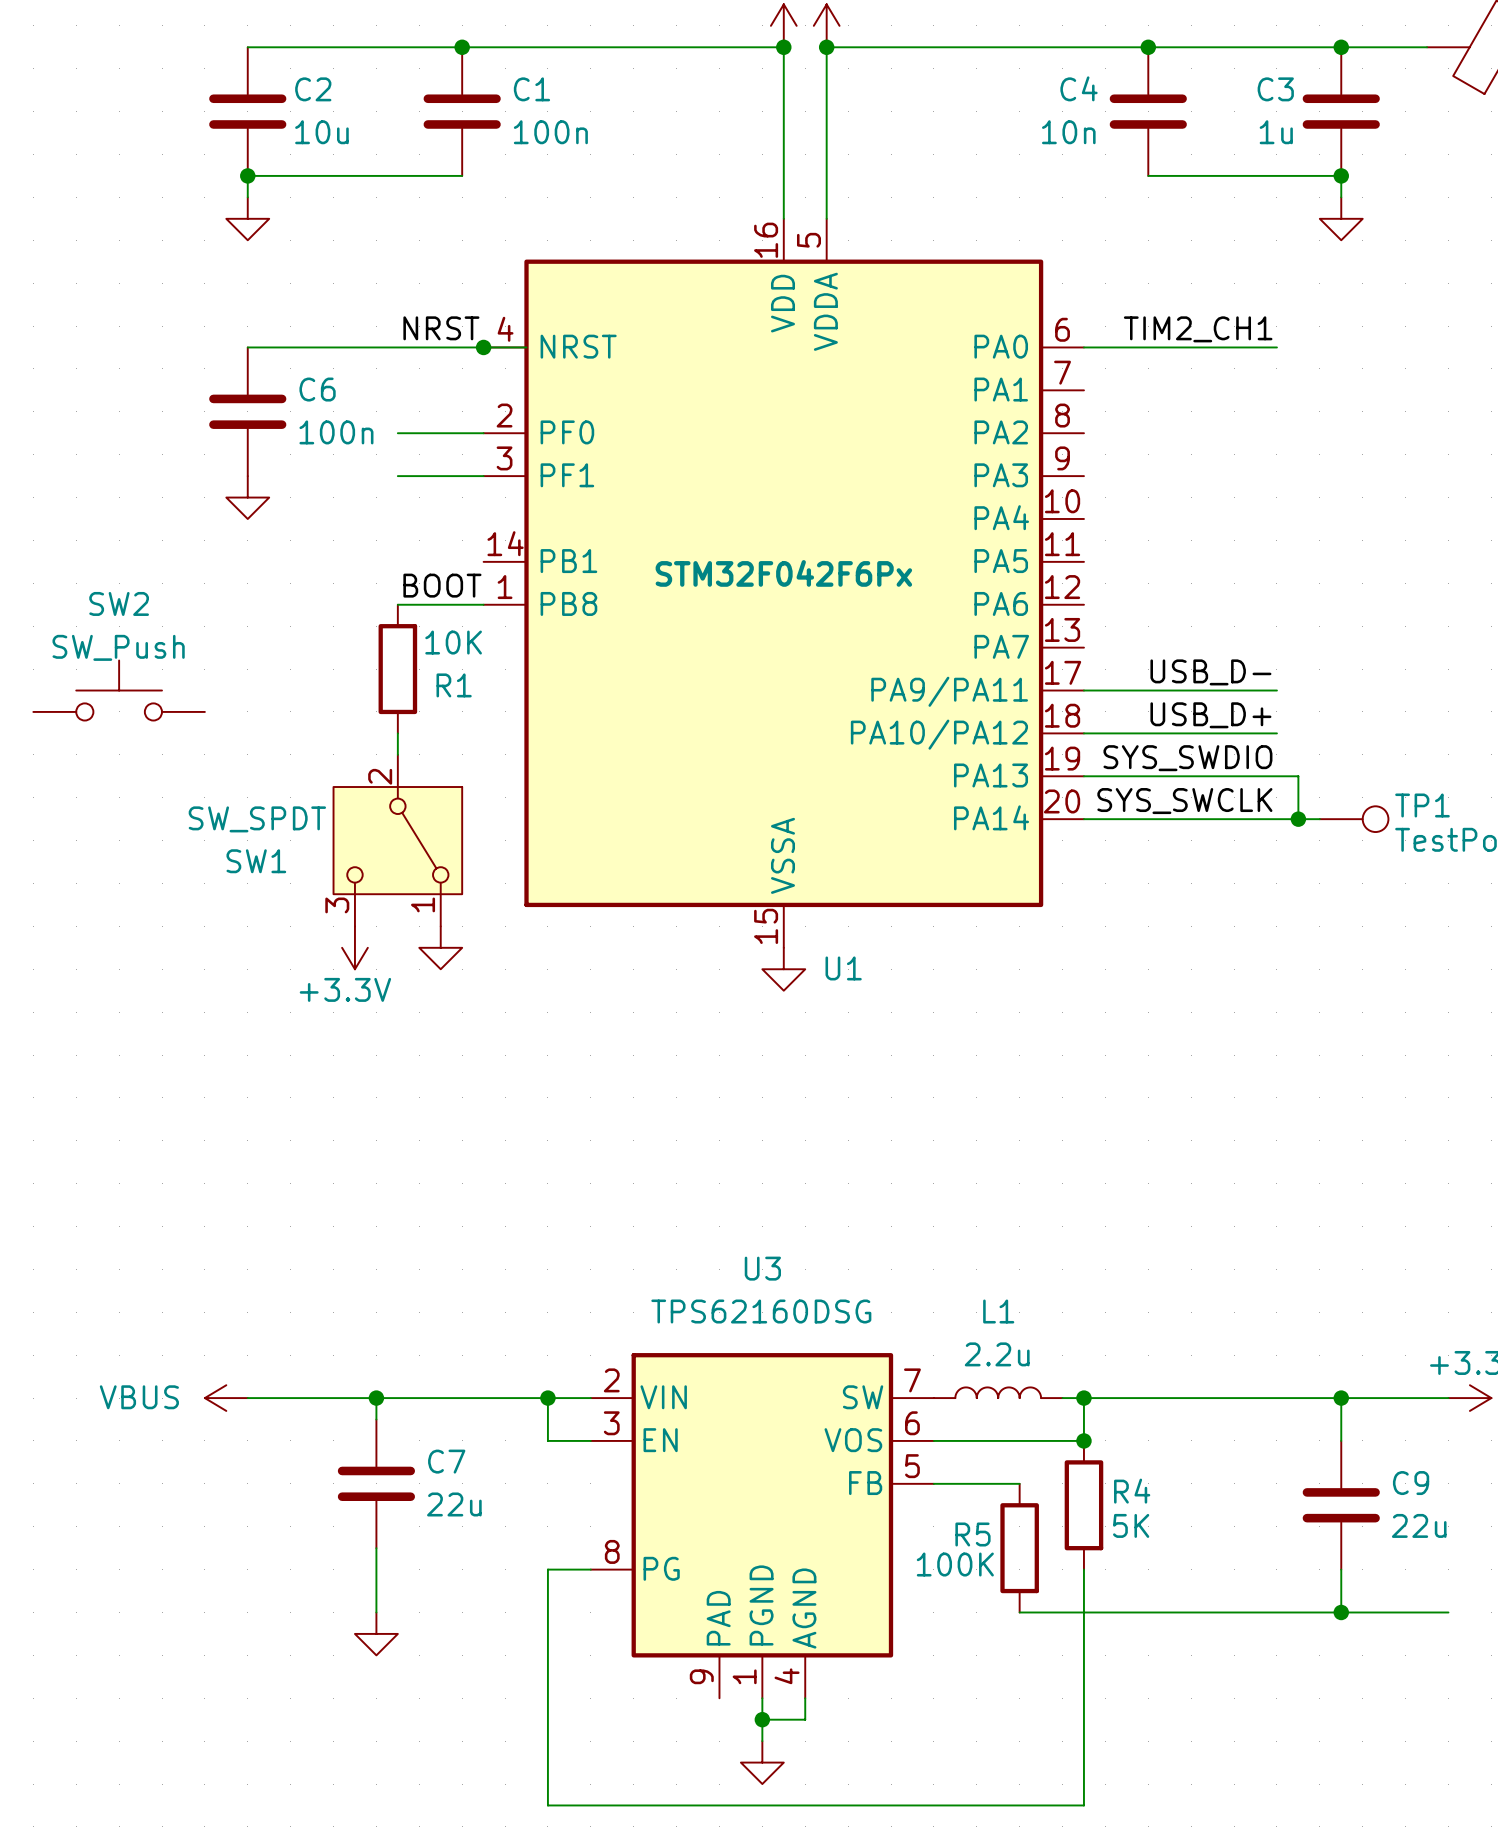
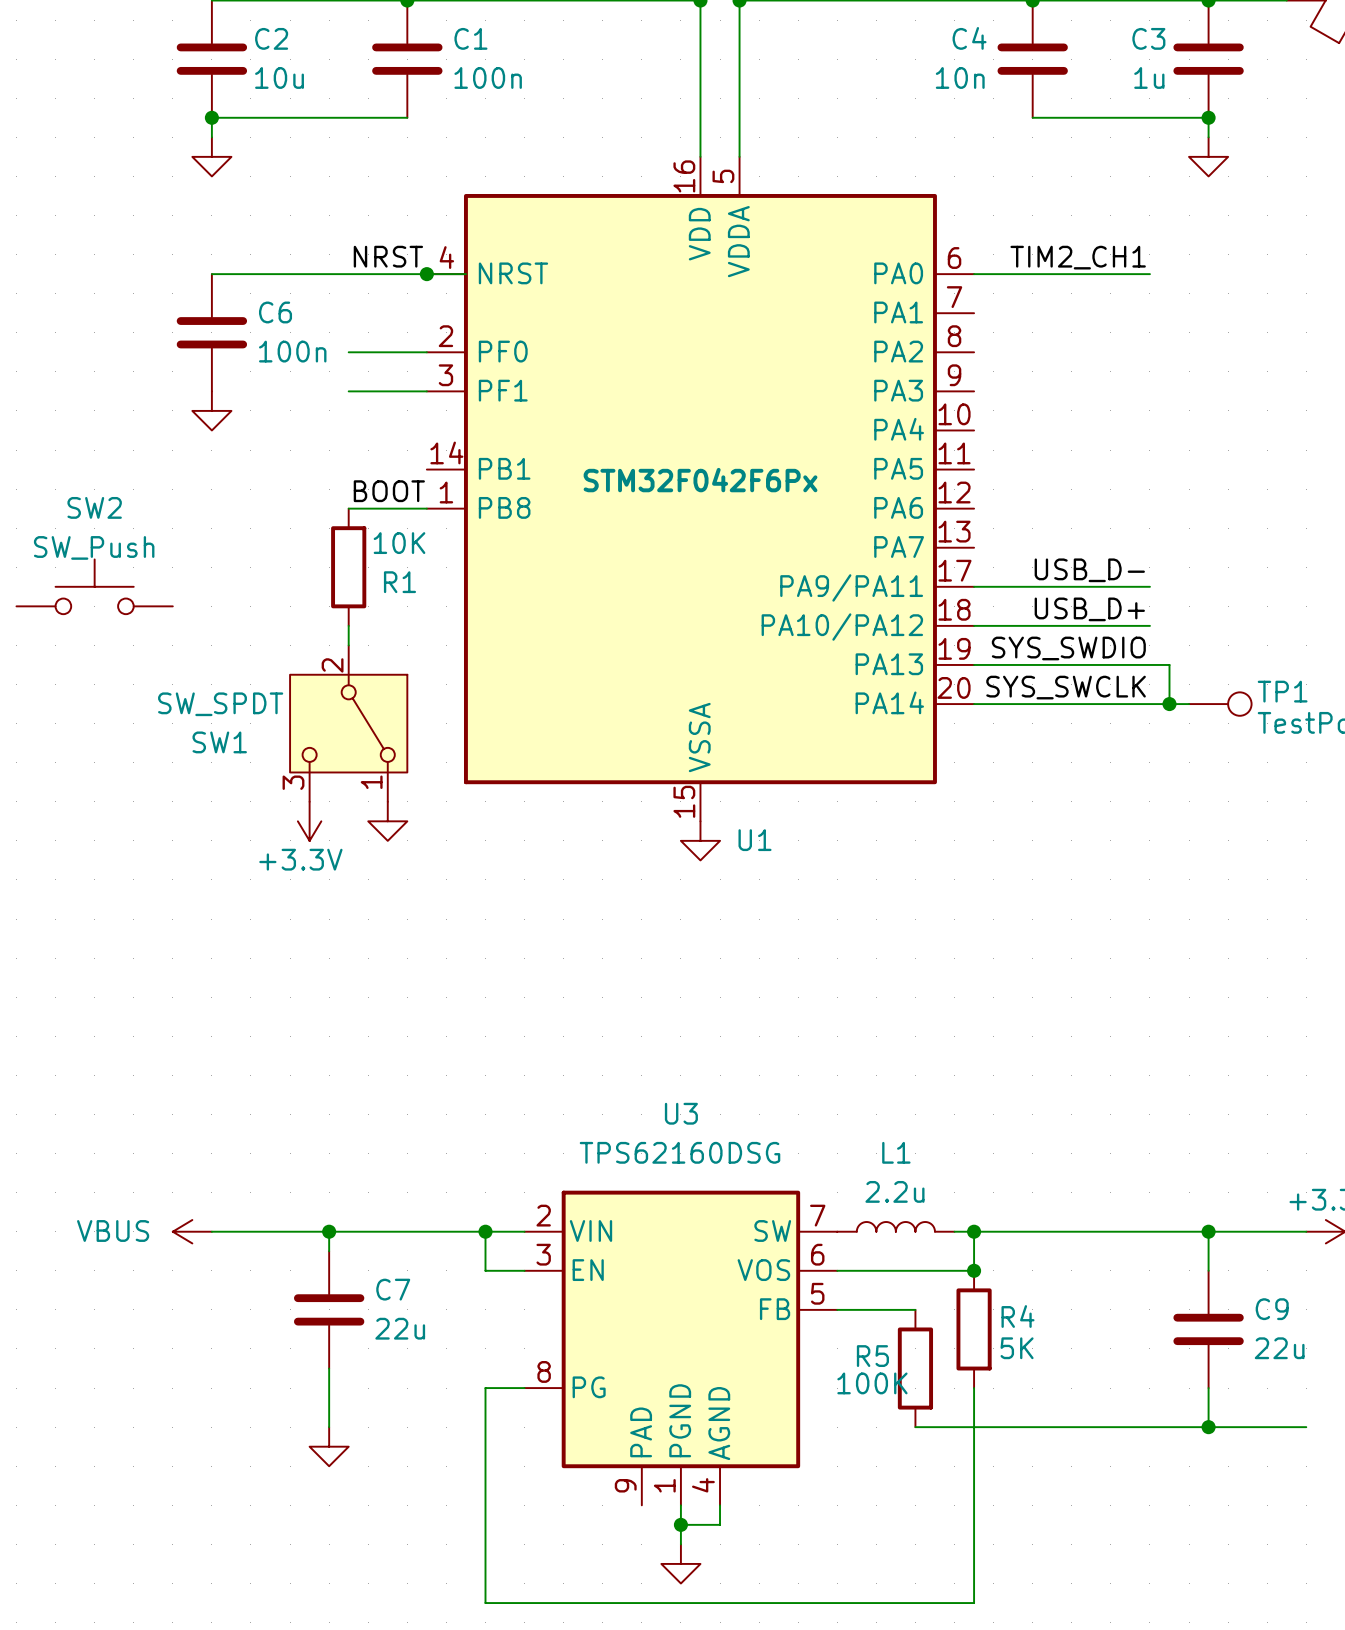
R5 value position: 100K (955, 1564) -> 100K (872, 1383)

